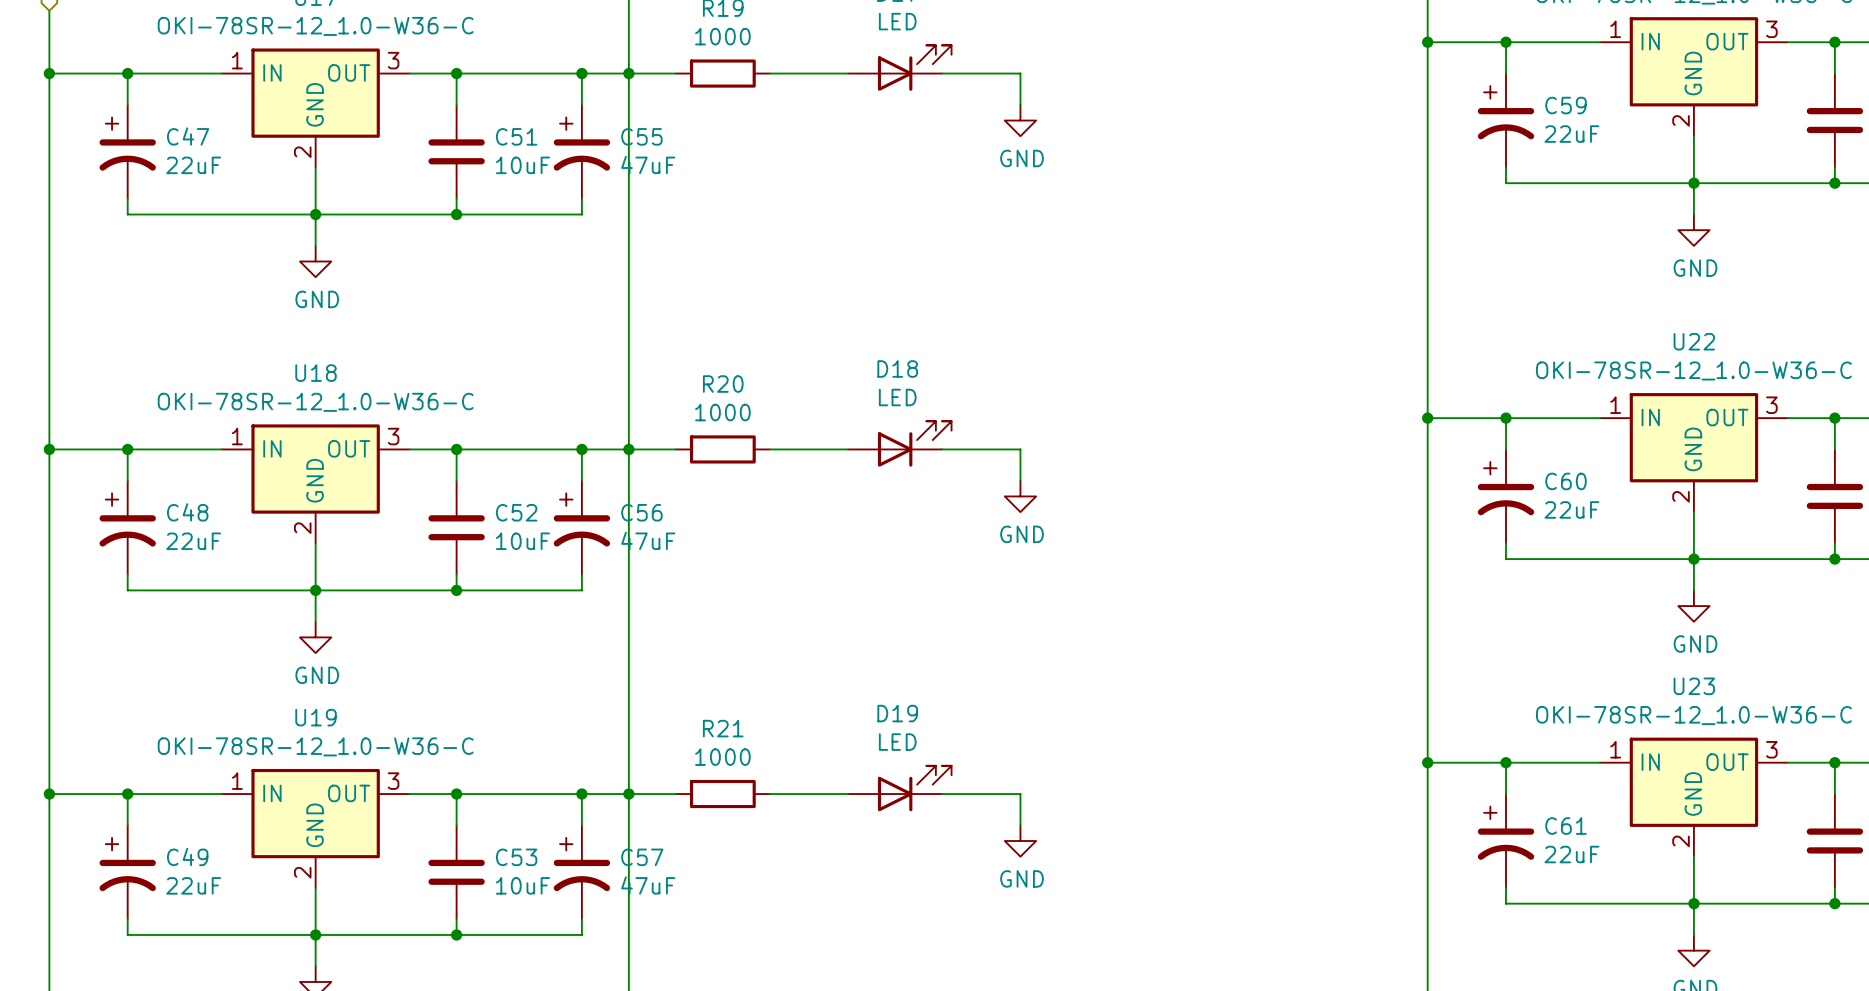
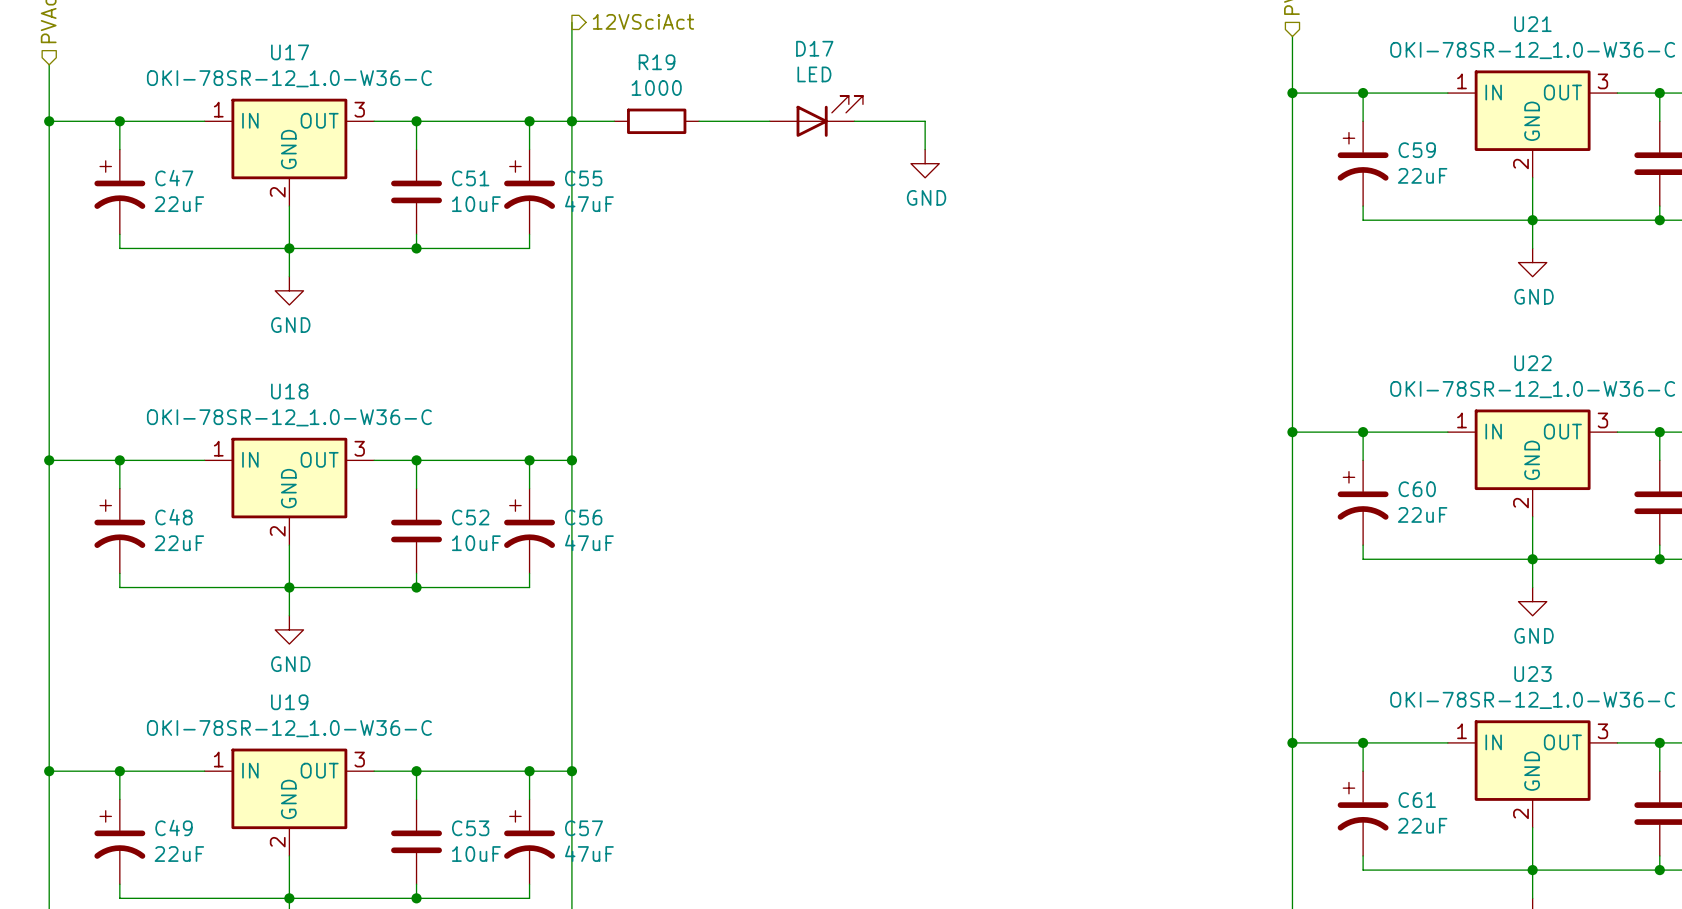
D18: LED (899, 443) -> none
wire: (628, 449) (675, 449) -> none
R20: 1000 (722, 449) -> none
wire: (769, 449) (848, 449) -> none
wire: (942, 449) (1020, 449) (1020, 480) -> none
power symbol: GND (1020, 496) -> none
D19: LED (899, 788) -> none
wire: (628, 794) (675, 794) -> none
R21: 1000 (722, 794) -> none
wire: (769, 794) (848, 794) -> none
wire: (942, 794) (1020, 794) (1020, 825) -> none
power symbol: GND (1020, 841) -> none

